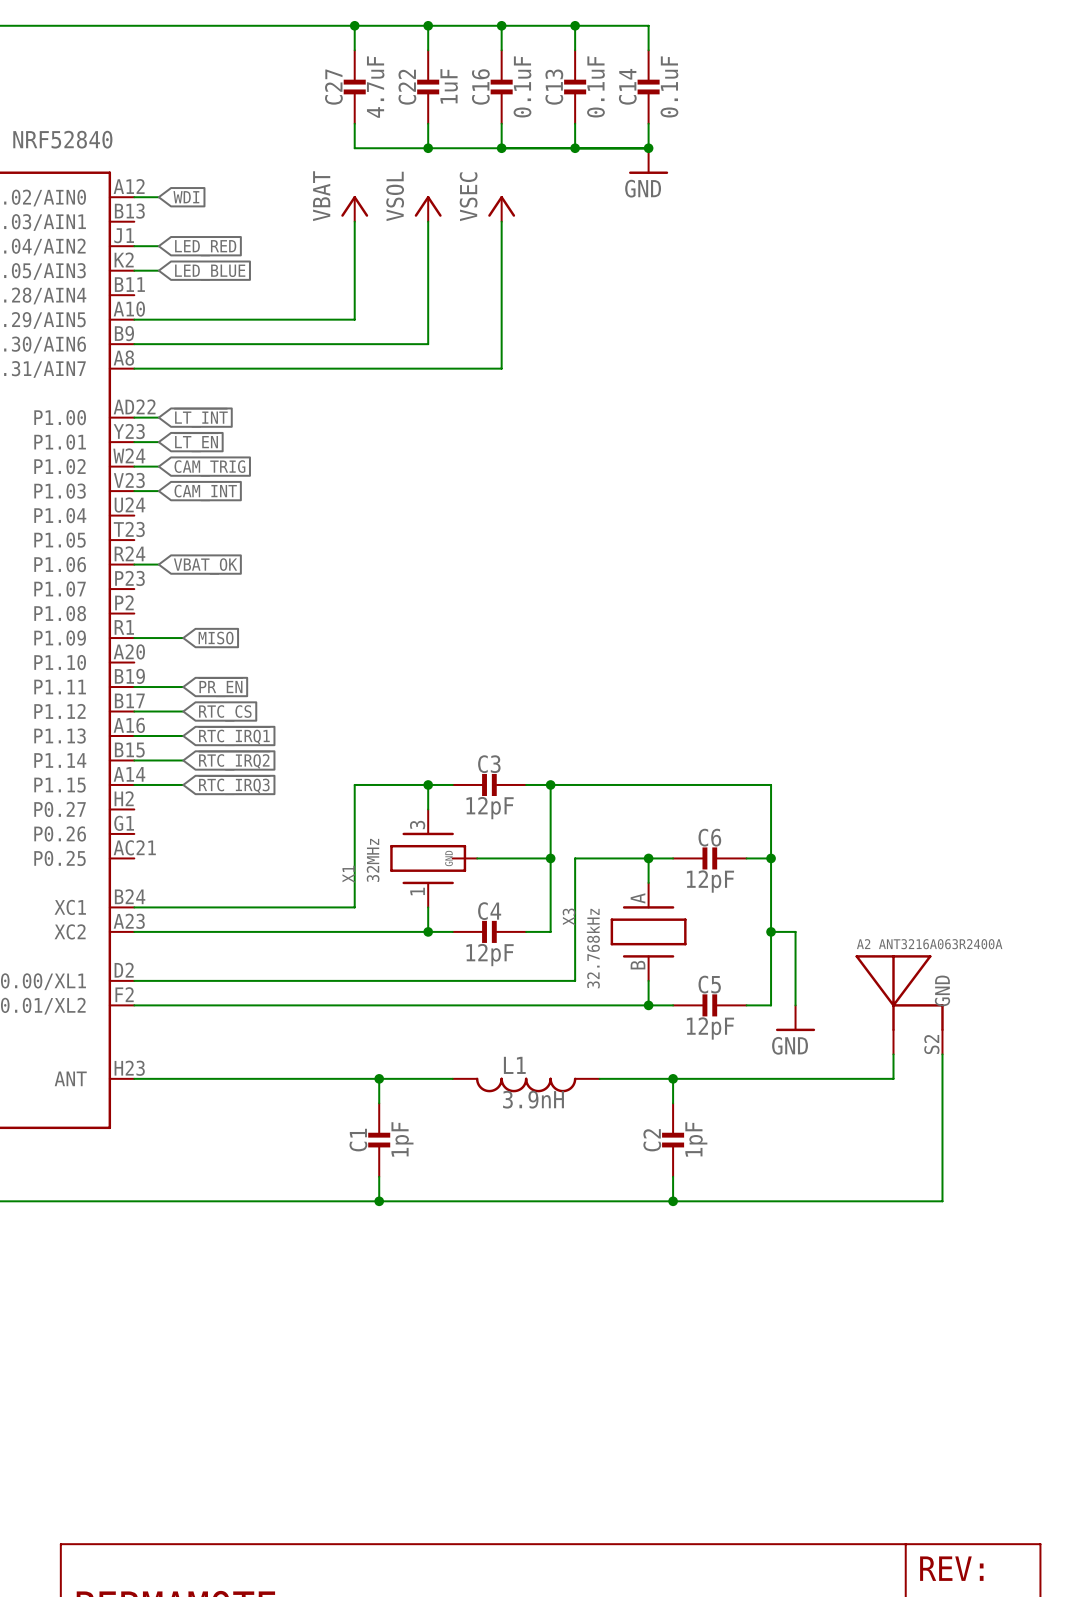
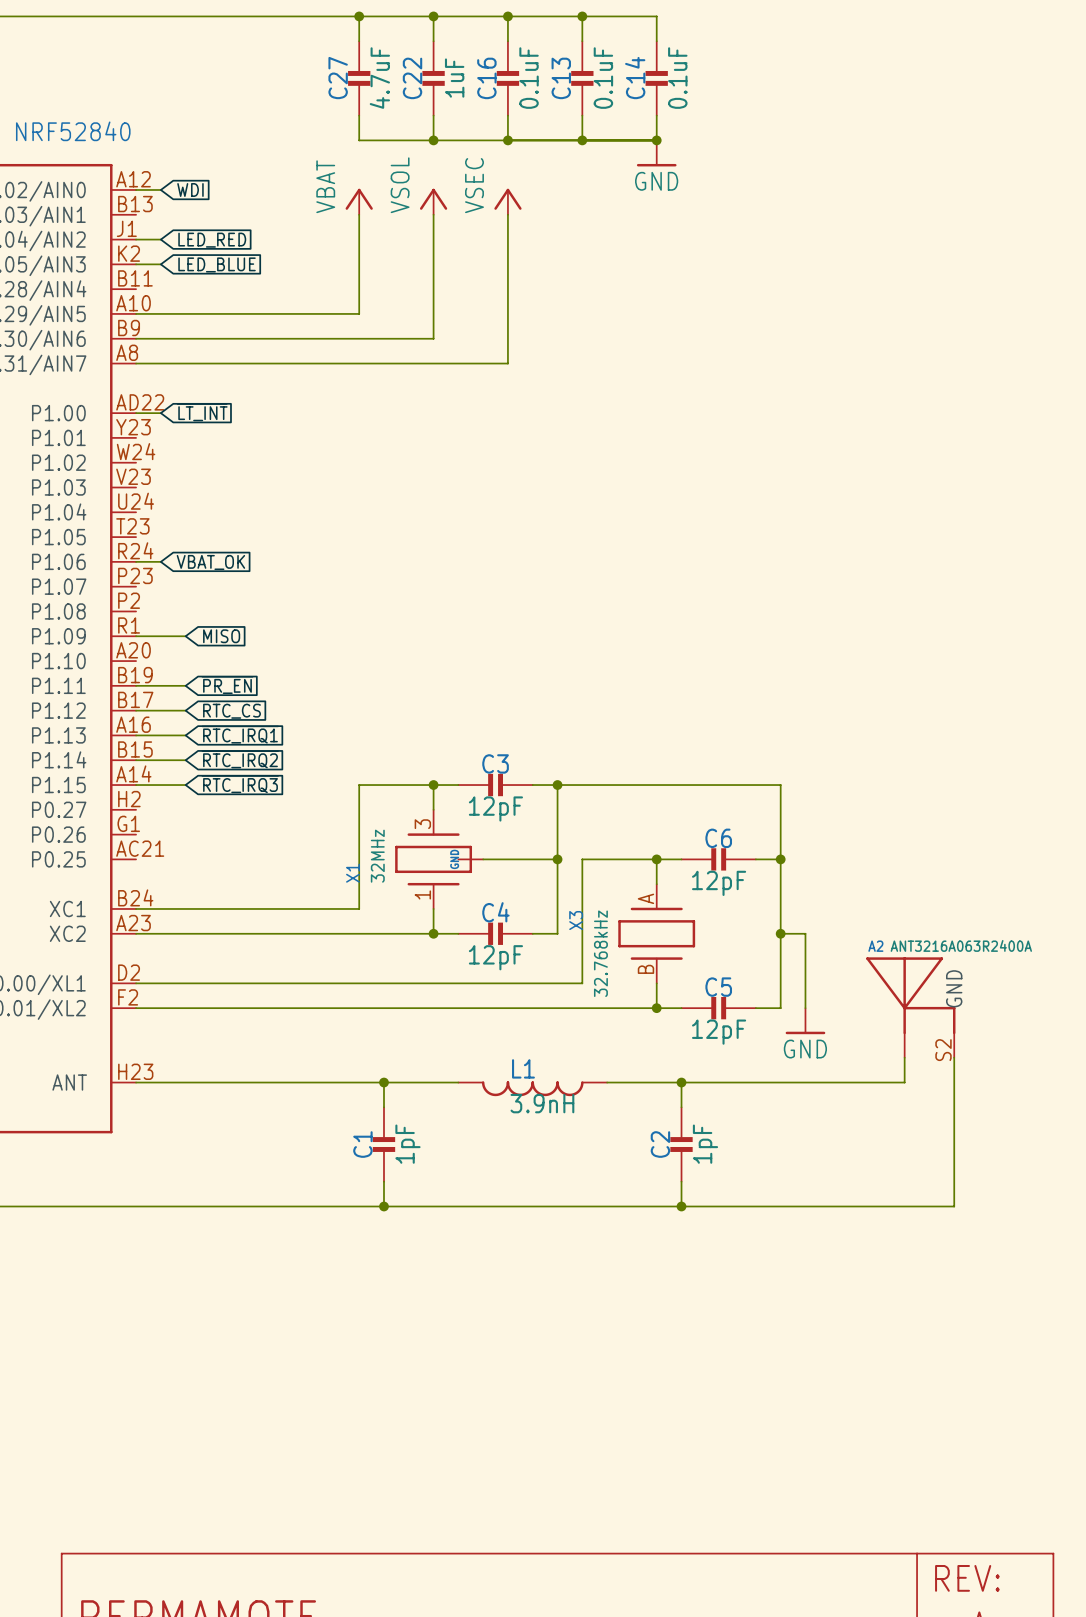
wire: (134, 442) (158, 442) -> none
global label: ~{LT_EN} (196, 442) -> none
wire: (134, 466) (158, 466) -> none
global label: CAM_TRIG (209, 468) -> none
wire: (134, 491) (158, 491) -> none
global label: CAM_INT (205, 492) -> none

